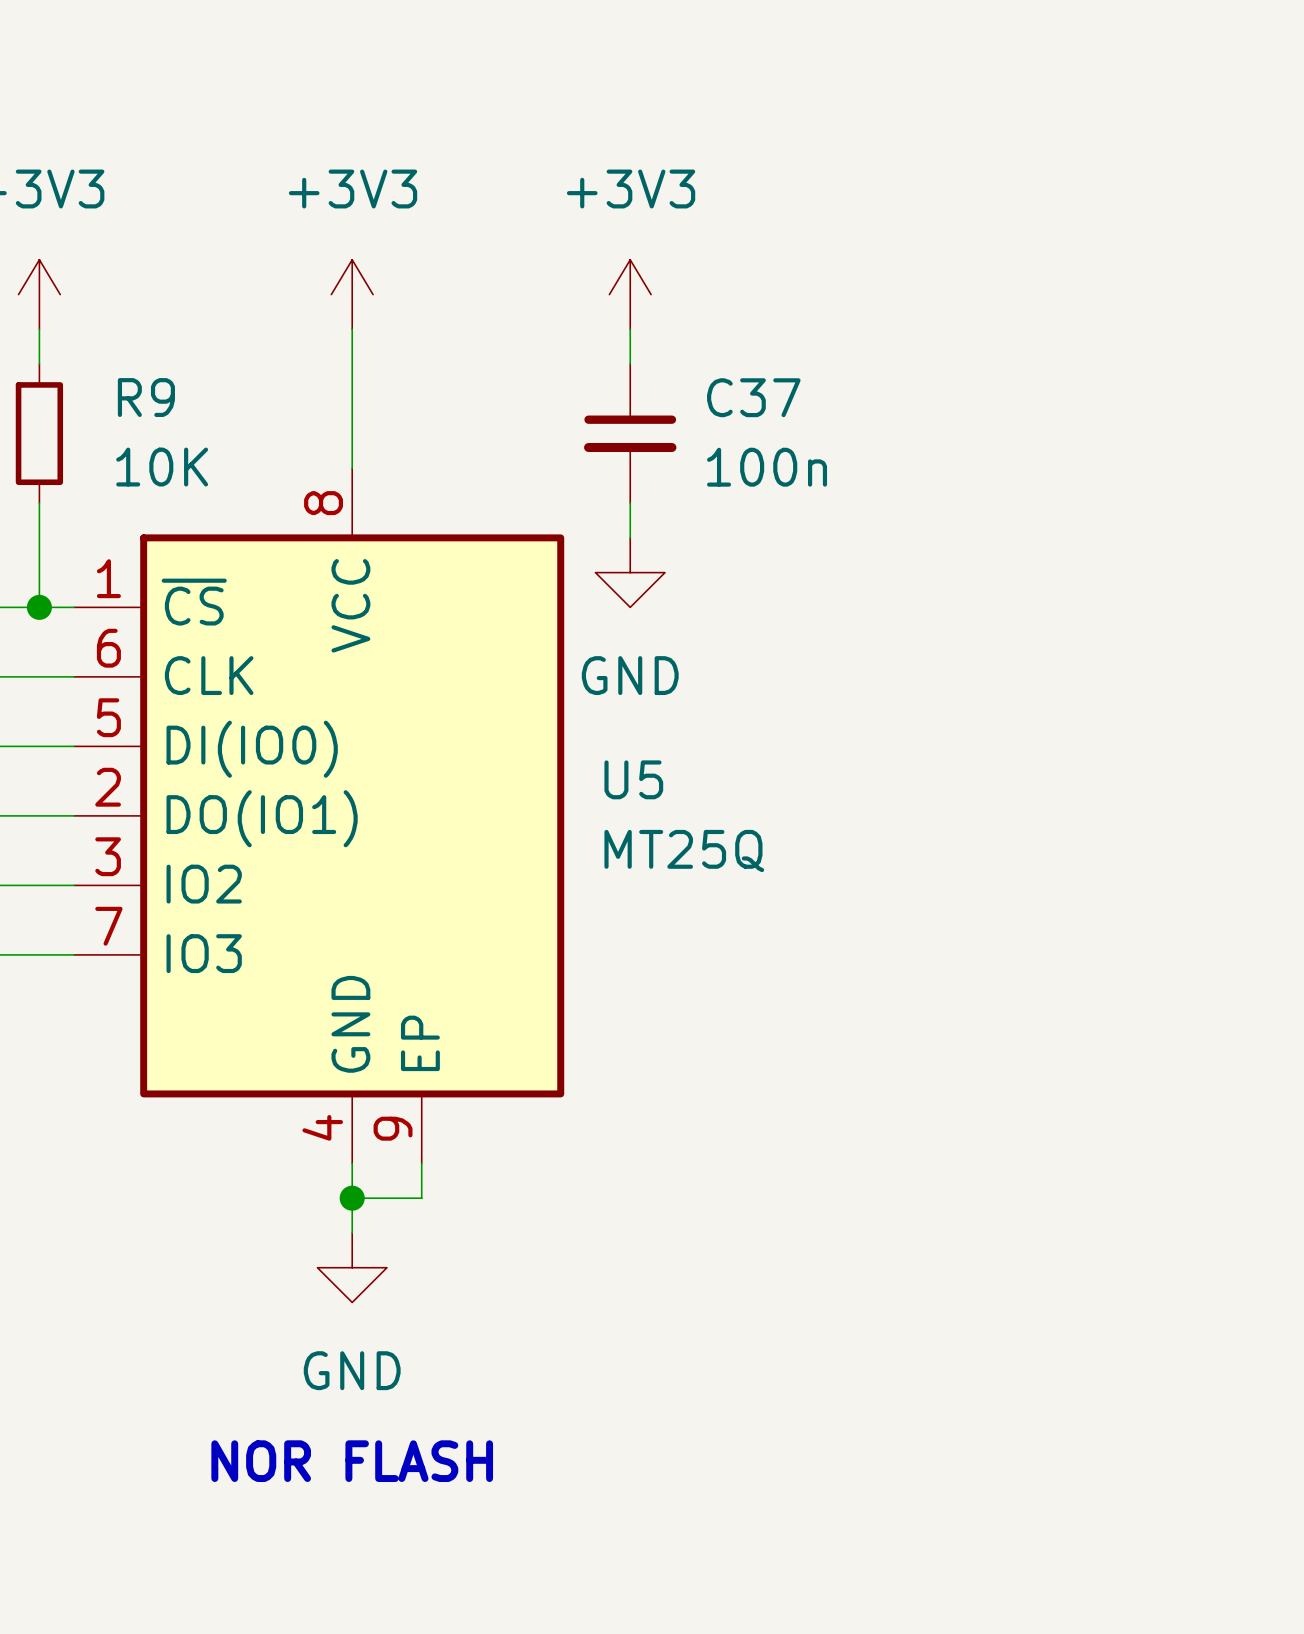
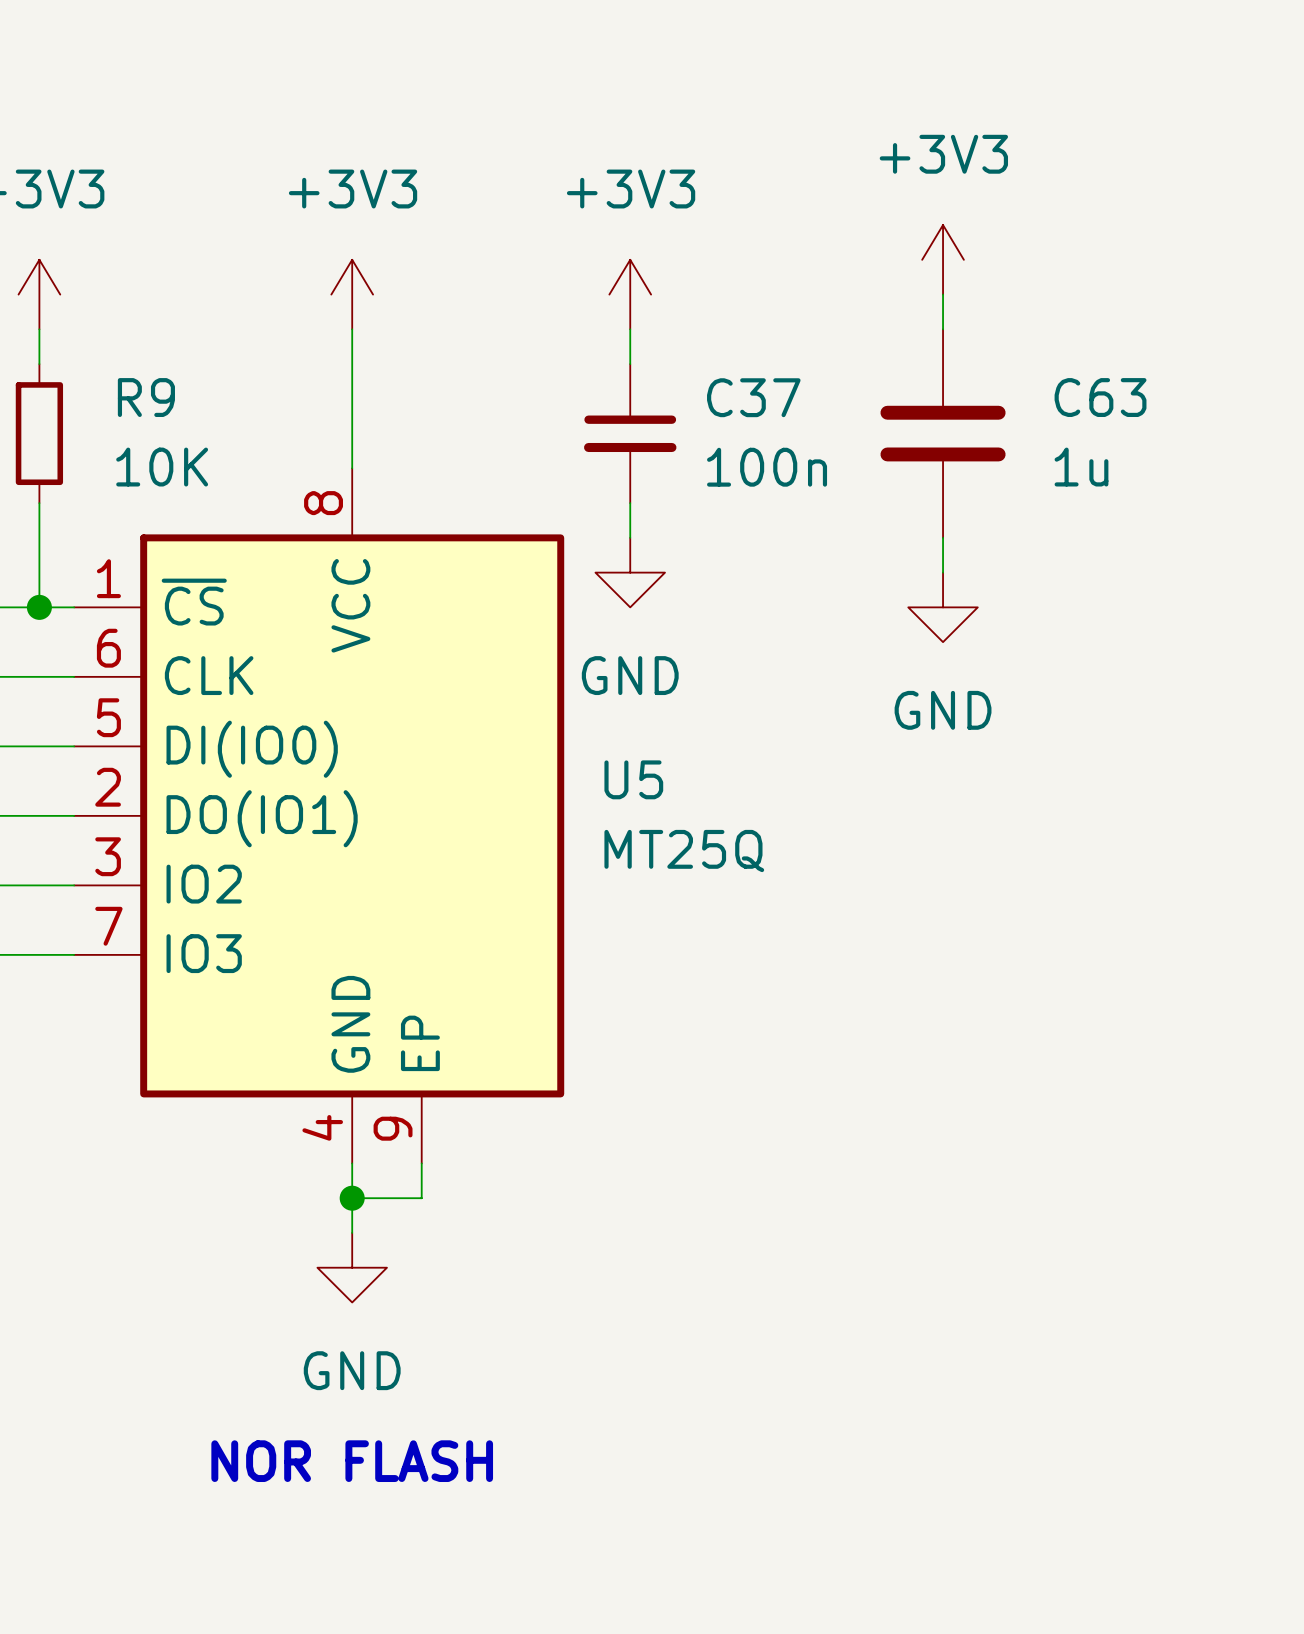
power symbol: none -> +3V3 (943, 259)
wire: none -> (943, 294) (943, 329)
C63: none -> 1u (943, 433)
wire: none -> (943, 537) (943, 572)
power symbol: none -> GND (943, 607)

